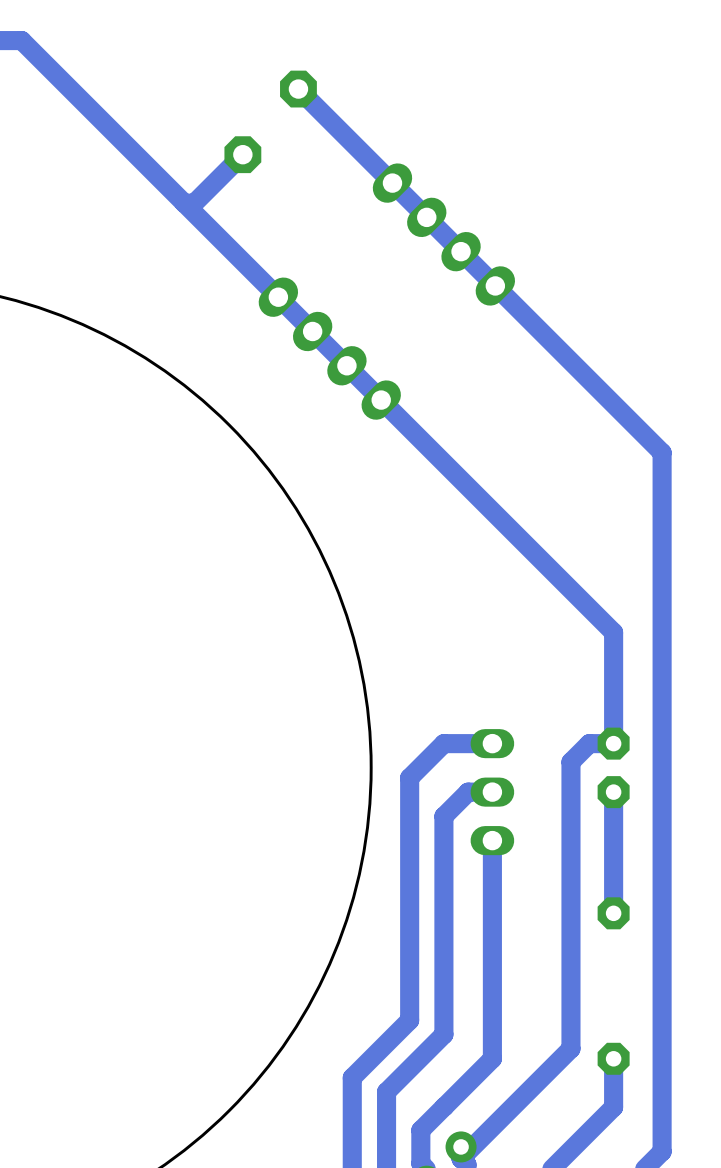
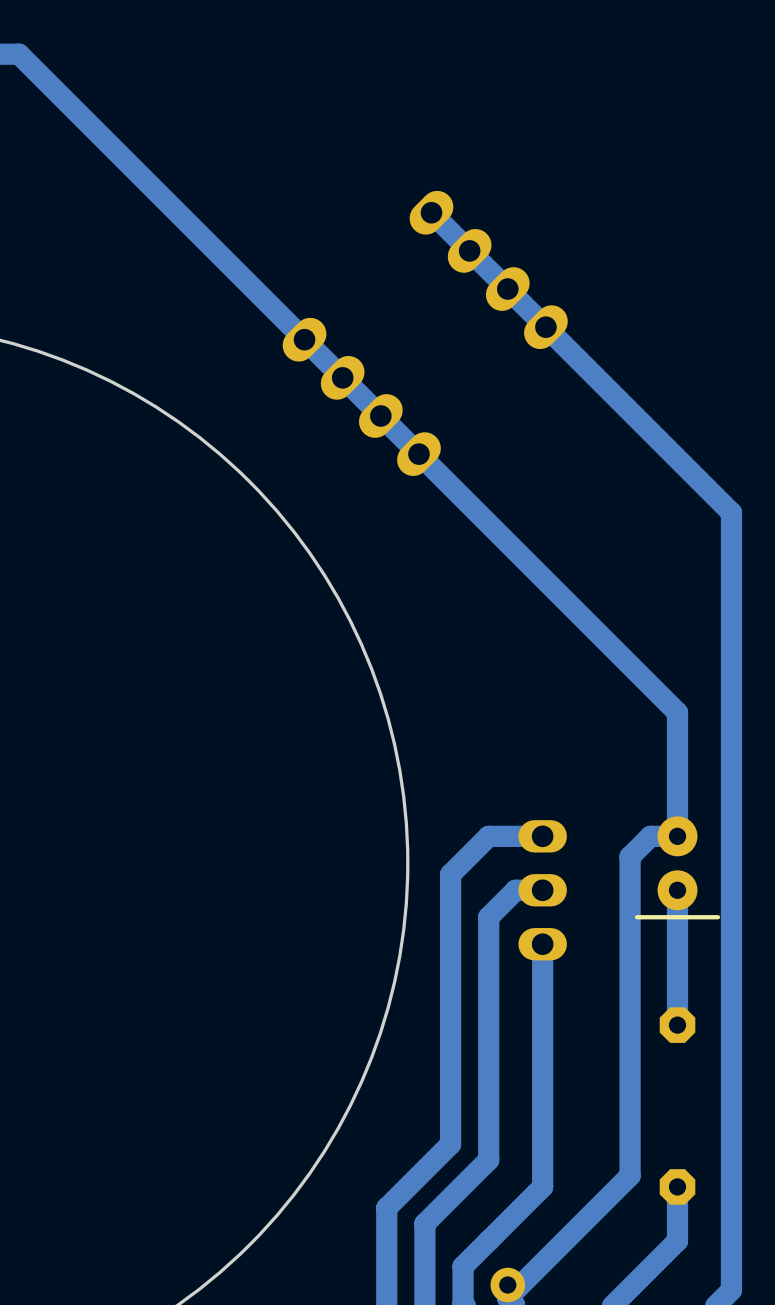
bottom track: (298, 89) (392, 183) -> none
part: (298, 89) -> none
bottom track: (242, 154) (194, 203) (184, 203) -> none
part: (242, 154) -> none
part footprint: [597, 727, 630, 809] -> [634, 816, 721, 920]

